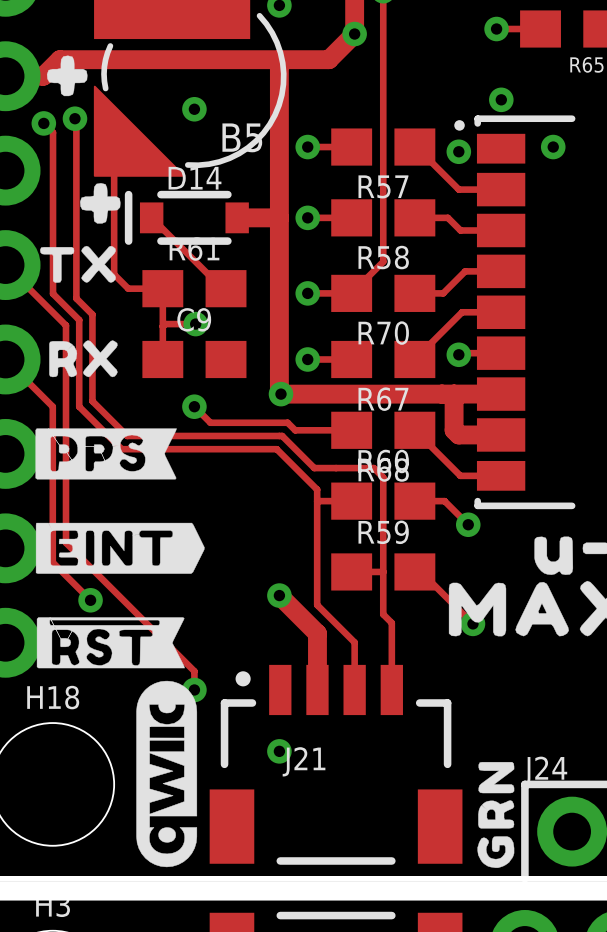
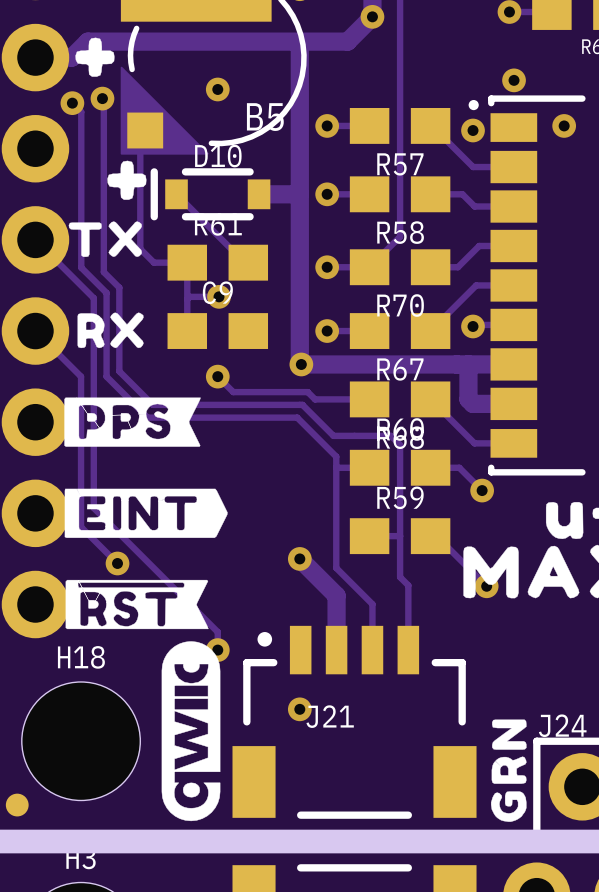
D14 name: D14 (195, 178) -> D10 (218, 156)

